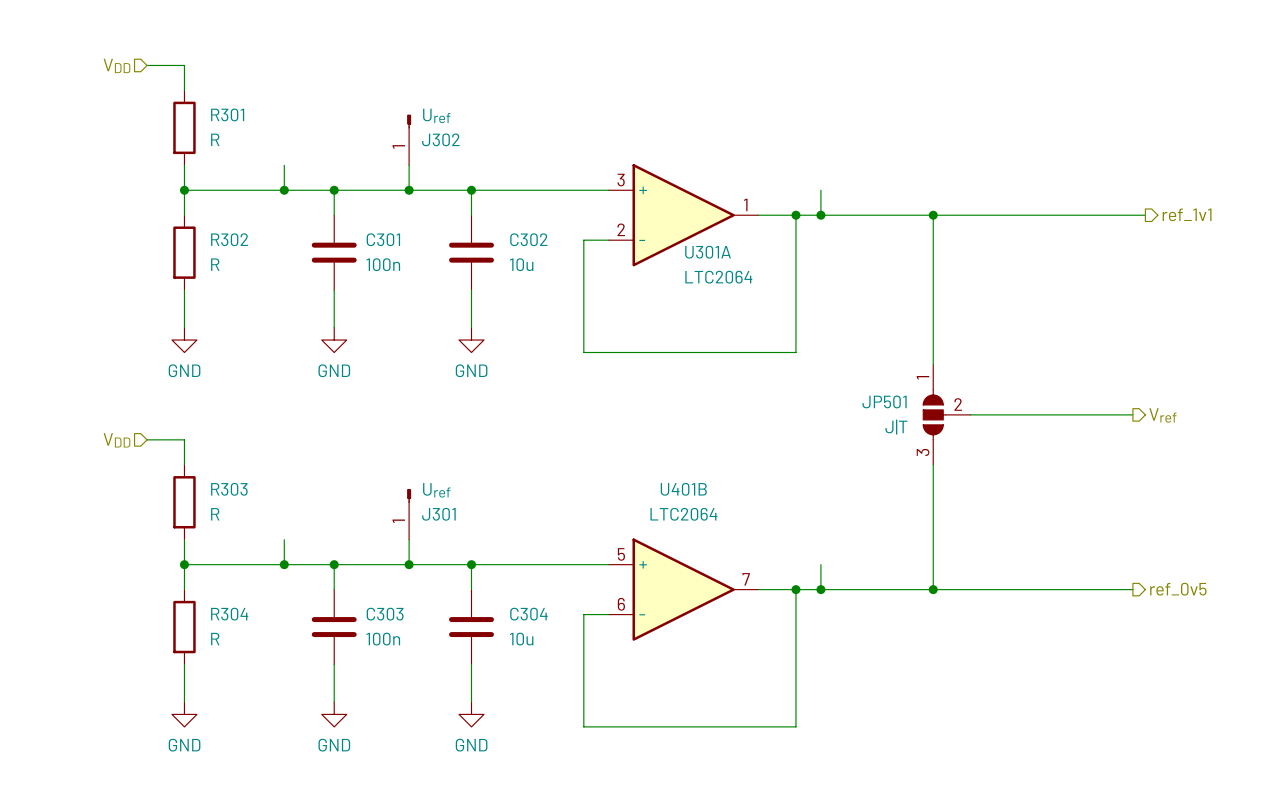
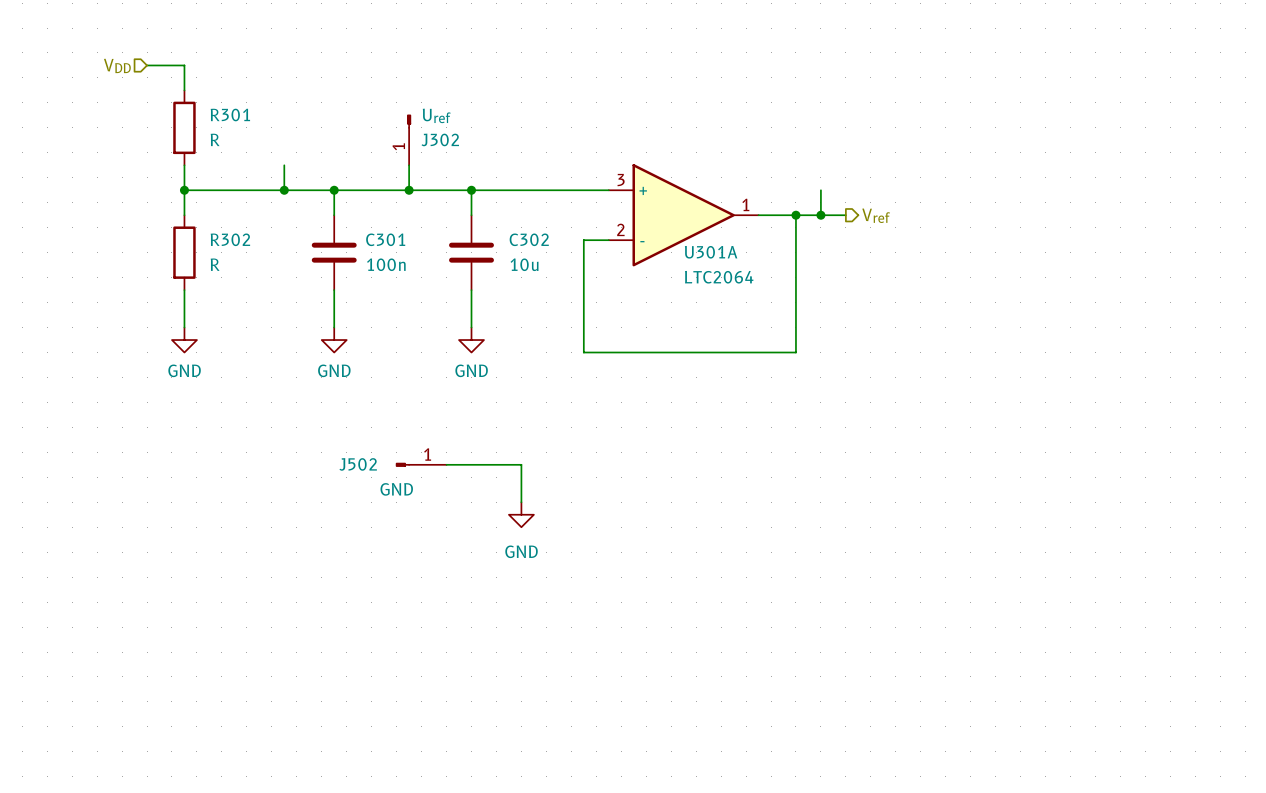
hierarchical label: ref_1v1 (1187, 214) -> none
wire: (845, 215) (1145, 215) -> none
hierarchical label: none -> Vref (876, 215)
wire: (933, 215) (933, 364) -> none
junction: (933, 215) -> none
JP501: J|T (946, 414) -> none
wire: (970, 414) (1132, 414) -> none
hierarchical label: Vref (1162, 415) -> none
wire: (147, 439) (184, 439) (184, 464) -> none
hierarchical label: VDD (116, 440) -> none
J502: none -> GND (421, 464)
wire: none -> (446, 464) (521, 464) (521, 502)
wire: (933, 464) (933, 589) -> none
R303: R (184, 502) -> none
J301: Uref (409, 514) -> none
power symbol: none -> GND (521, 514)
wire: (184, 539) (184, 589) -> none
wire: (284, 539) (284, 564) -> none
wire: (409, 539) (409, 564) -> none
wire: (184, 564) (608, 564) -> none
junction: (184, 564) -> none
junction: (284, 564) -> none
wire: (334, 564) (334, 589) -> none
junction: (334, 564) -> none
junction: (409, 564) -> none
wire: (471, 564) (471, 589) -> none
junction: (471, 564) -> none
wire: (820, 564) (820, 589) -> none
U401B: LTC2064 (683, 589) -> none
wire: (758, 589) (1132, 589) -> none
wire: (795, 589) (795, 726) (583, 726) (583, 614) (608, 614) -> none
junction: (795, 589) -> none
junction: (820, 589) -> none
junction: (933, 589) -> none
hierarchical label: ref_0v5 (1178, 589) -> none
R304: R (184, 627) -> none
C303: 100n (334, 627) -> none
C304: 10u (471, 627) -> none
wire: (184, 664) (184, 701) -> none
wire: (334, 664) (334, 701) -> none
wire: (471, 664) (471, 701) -> none
power symbol: GND (184, 714) -> none
power symbol: GND (334, 714) -> none
power symbol: GND (471, 714) -> none

